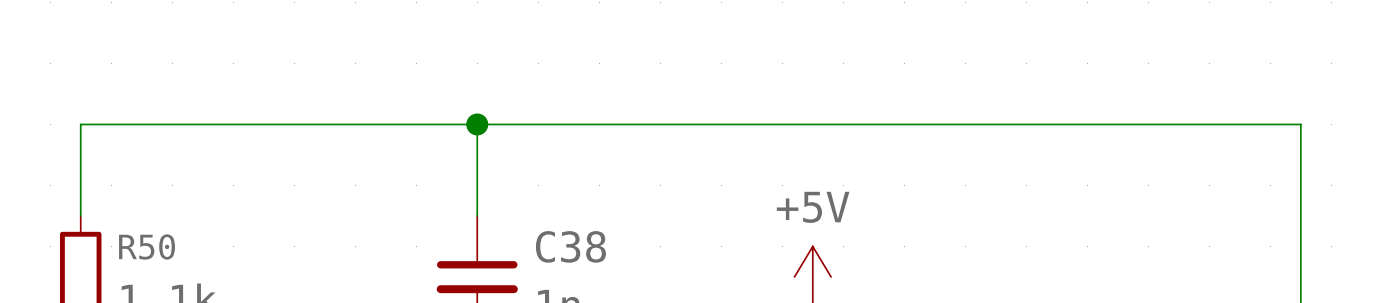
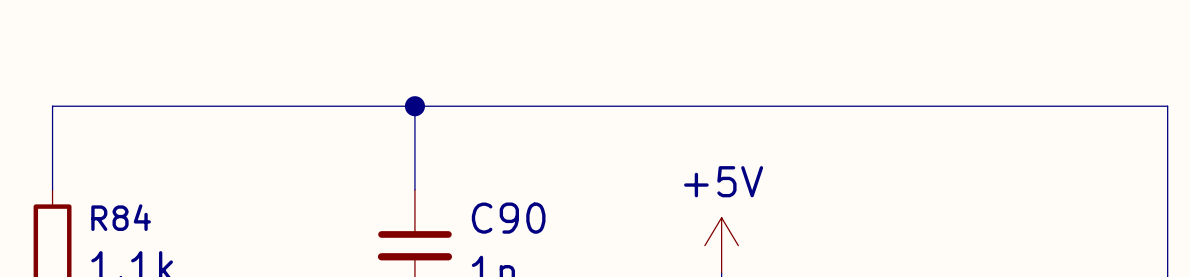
R50 name: R50 (147, 246) -> R84 (121, 217)
C38 name: C38 (570, 246) -> C90 (508, 218)

